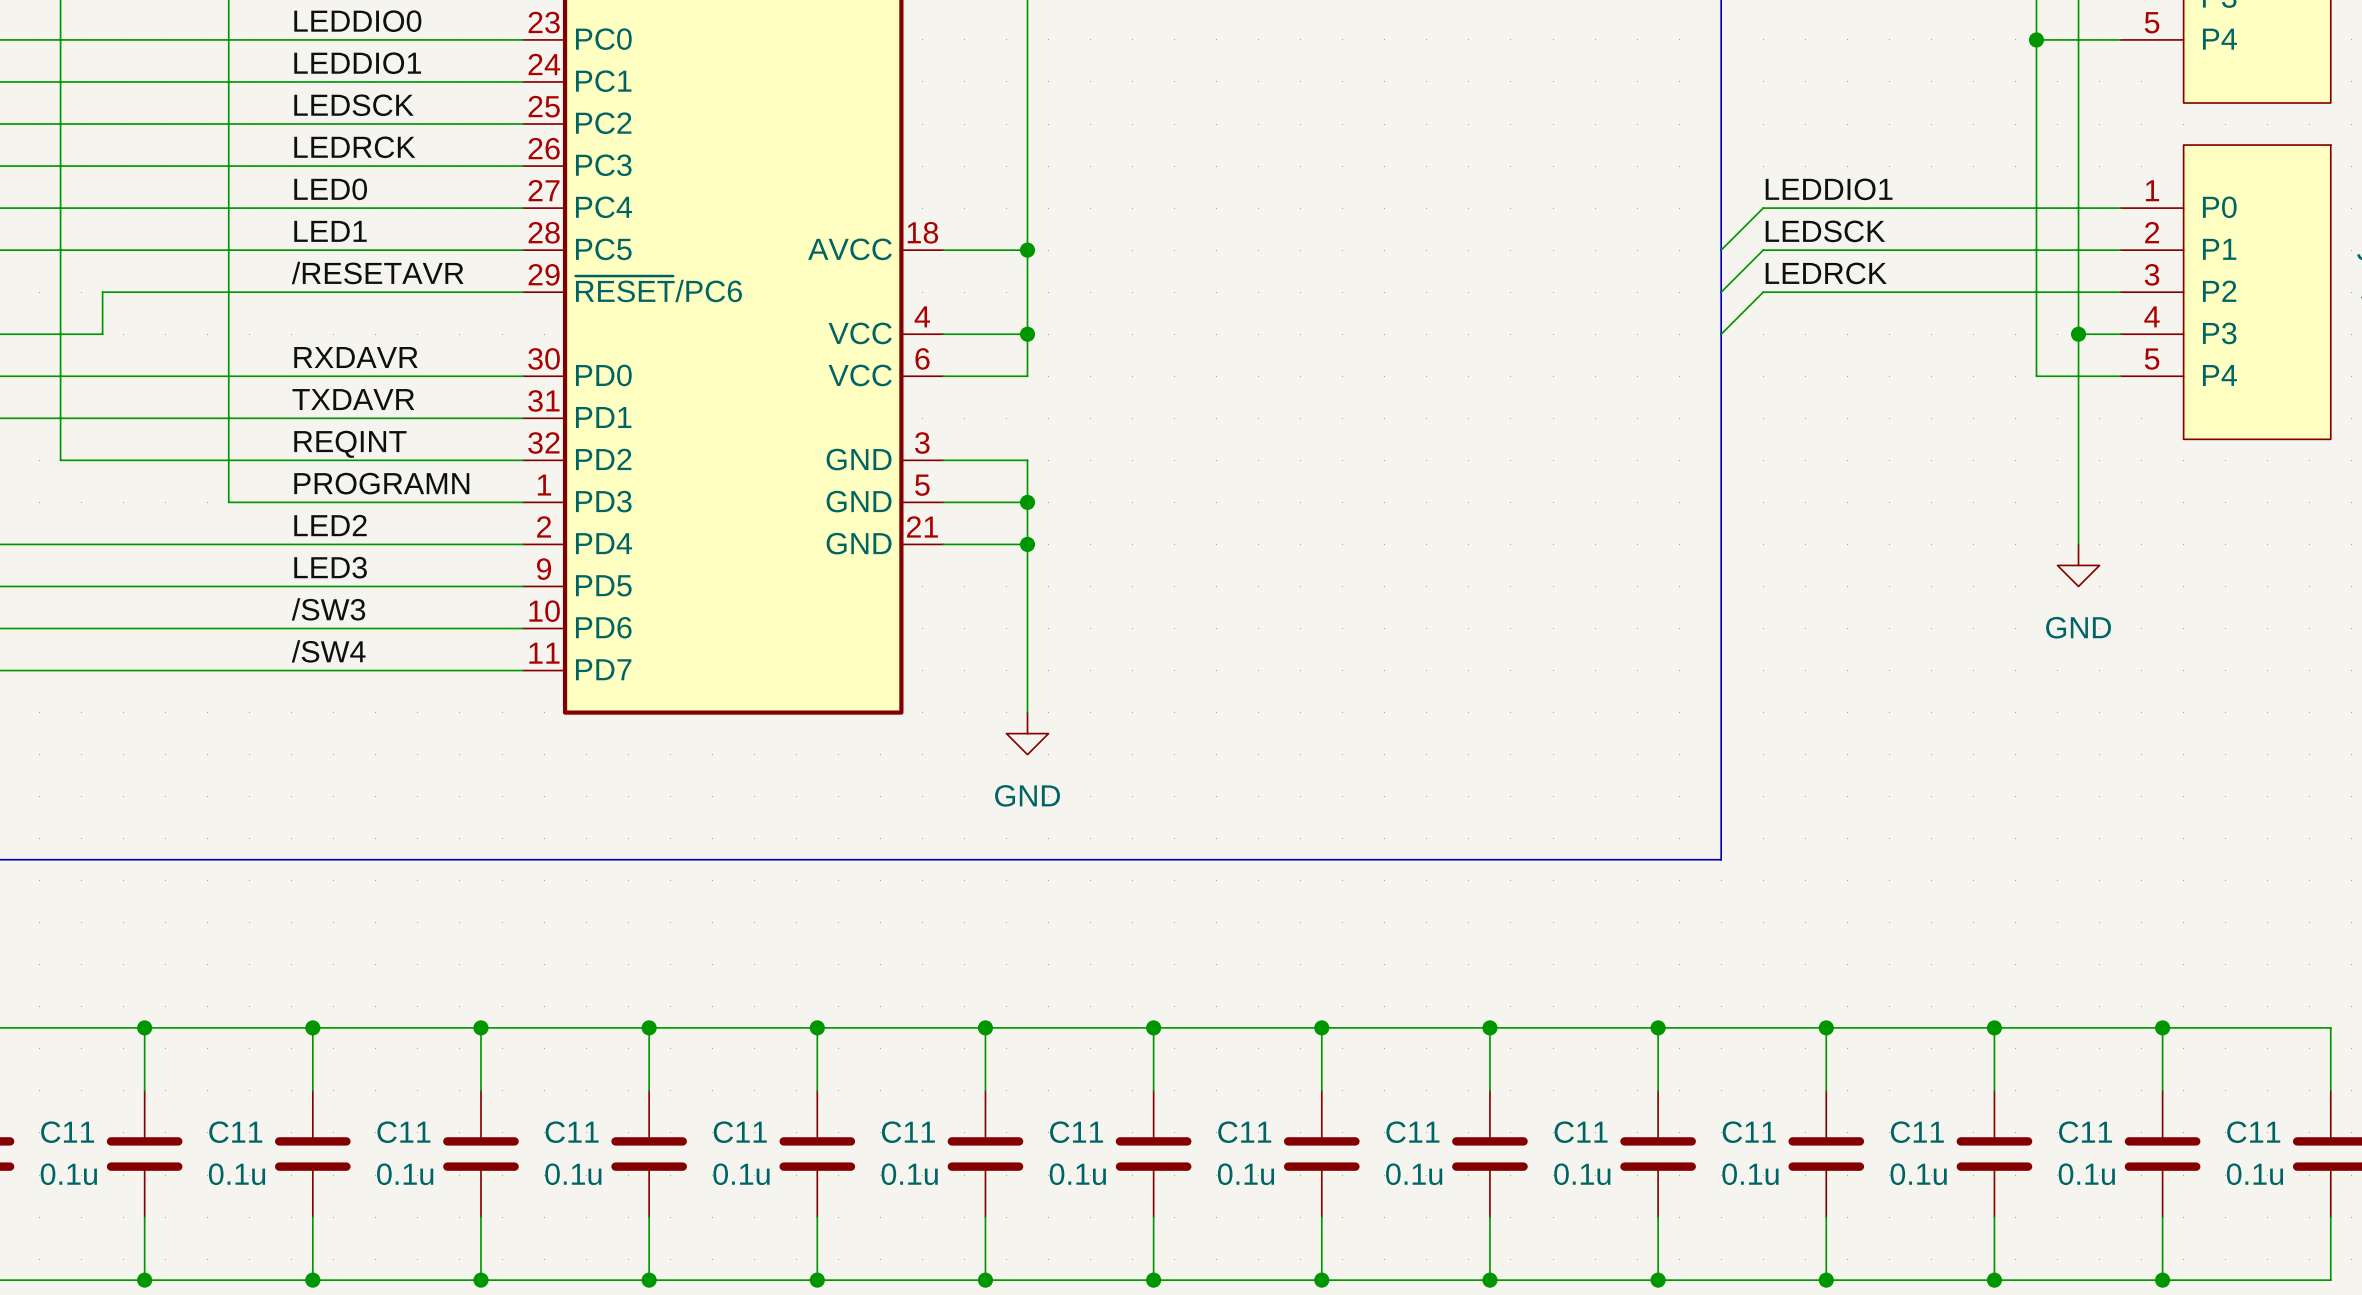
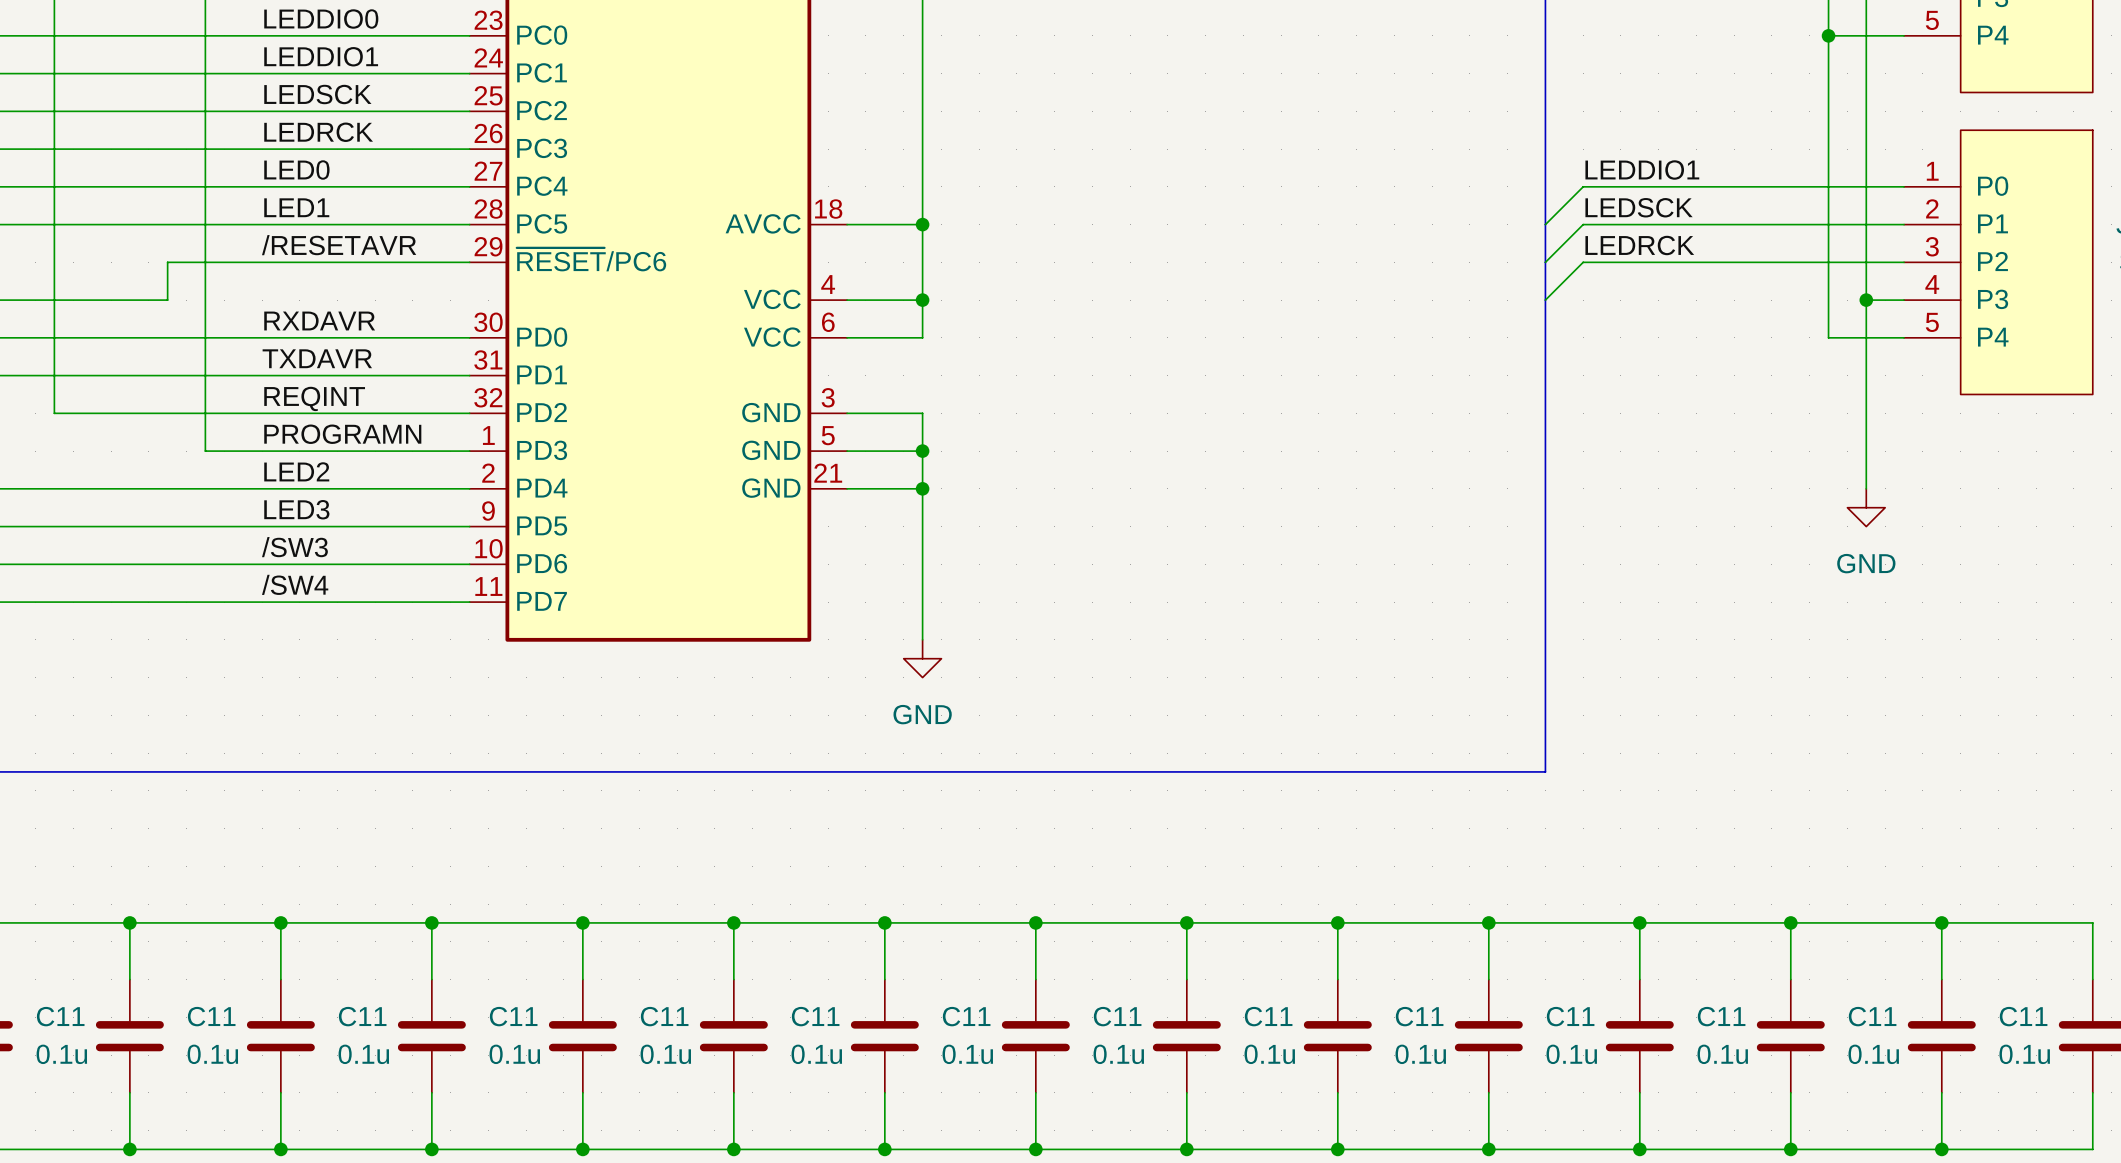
wire: (186, 292) (102, 292) (102, 334) -> (167, 262) (167, 300) (92, 300)

